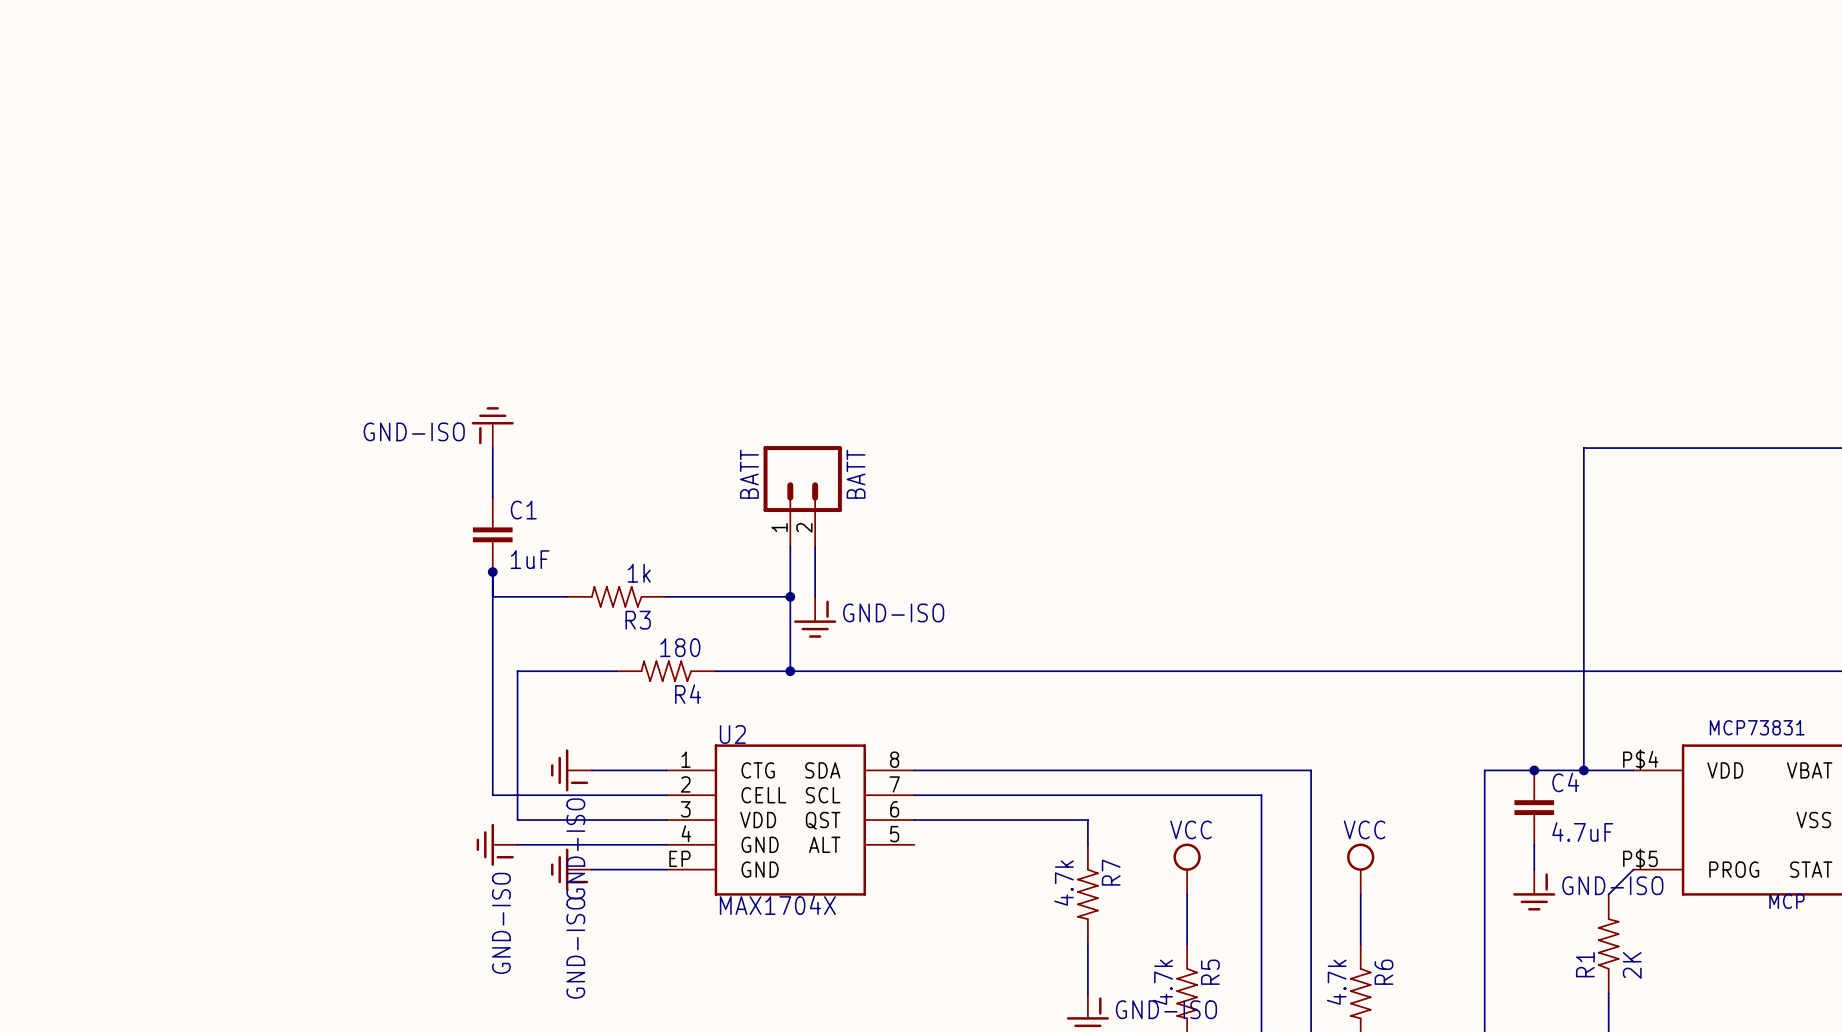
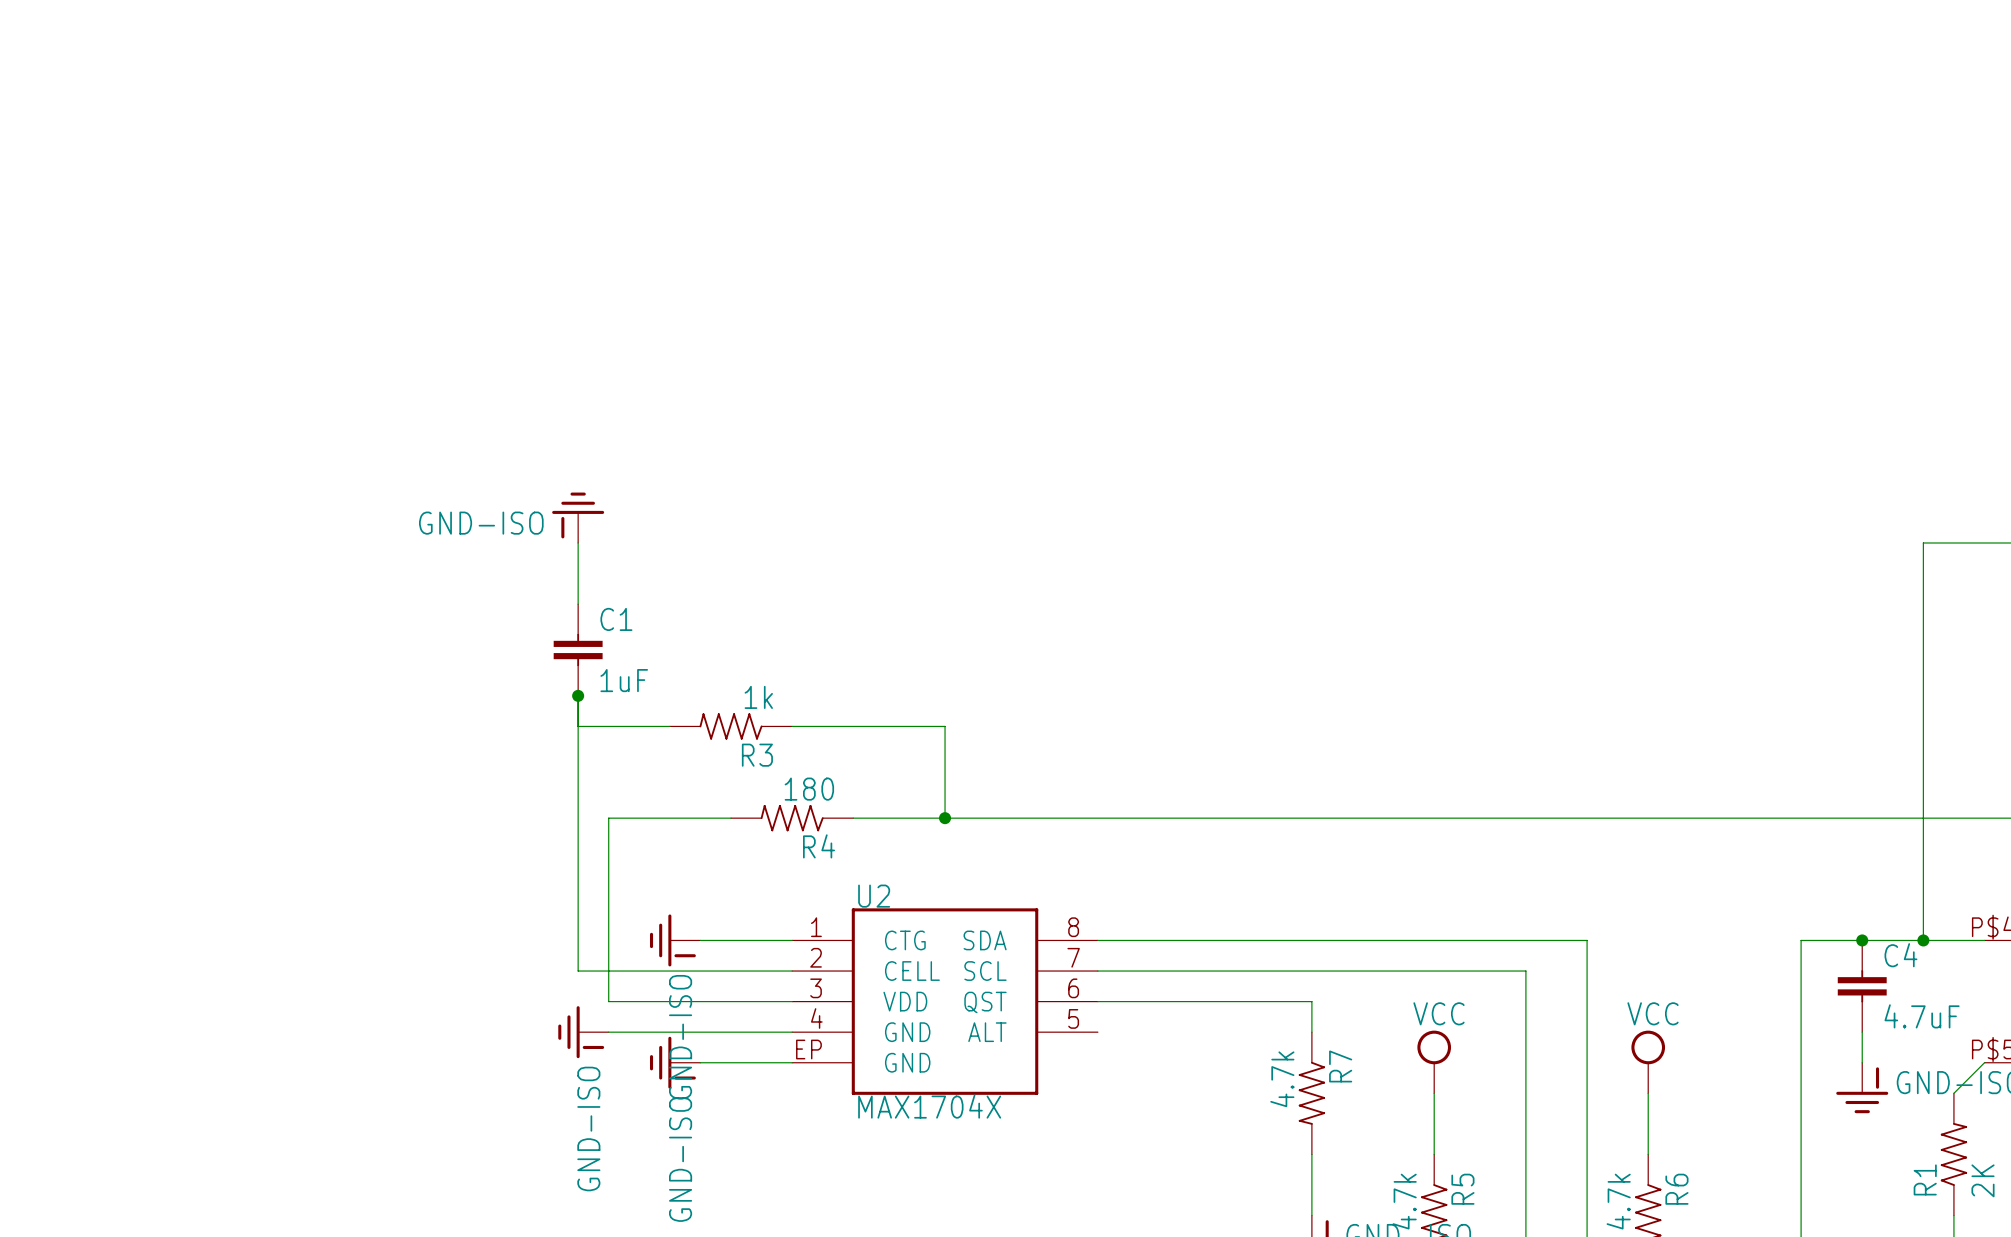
BATT: BATT (802, 496) -> none
wire: (790, 547) (790, 596) -> none
wire: (815, 547) (815, 596) -> none
junction: (790, 596) -> none
power symbol: GND-ISO (815, 617) -> none

